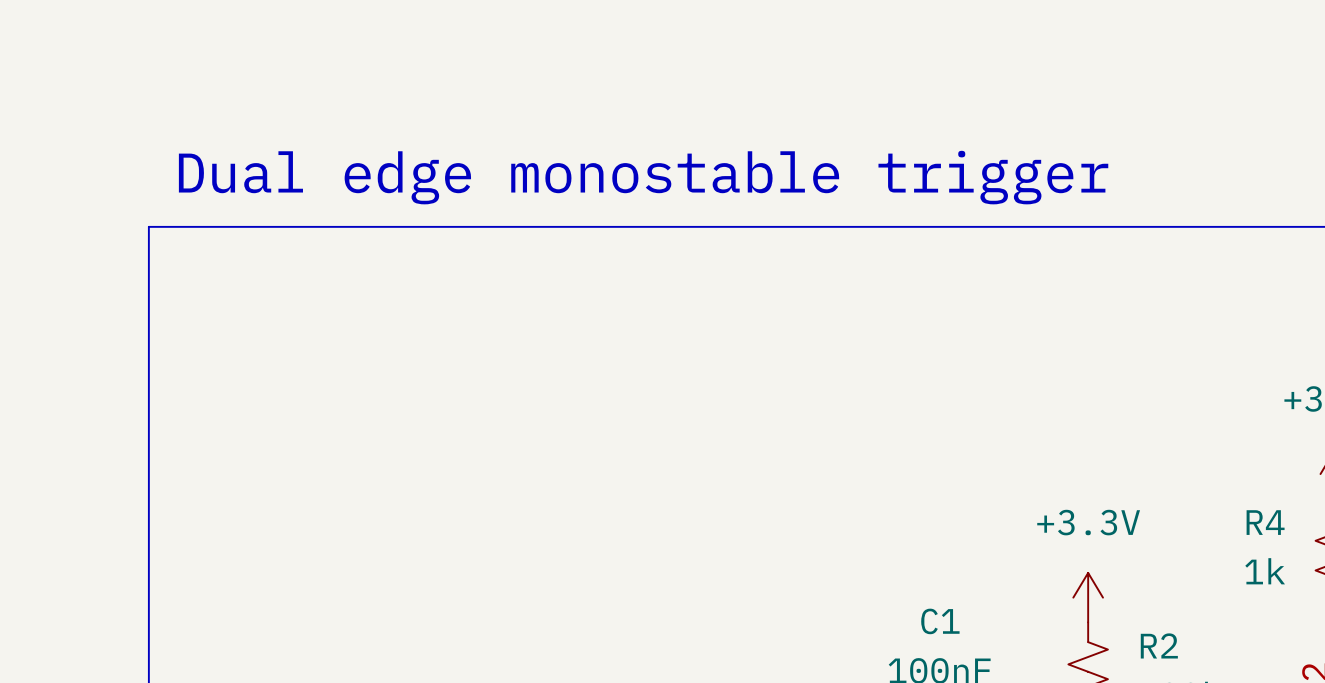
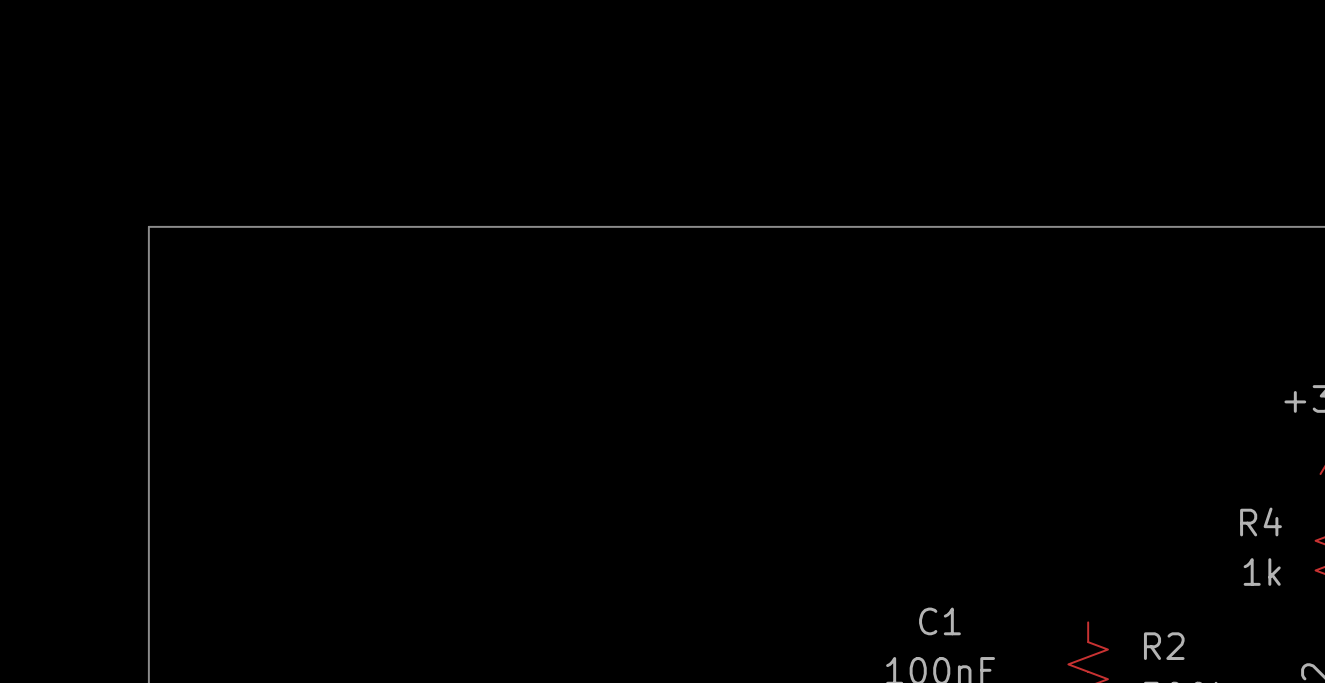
text: Dual edge monostable trigger (643, 177) -> none
power symbol: +3.3V (1088, 597) -> none

